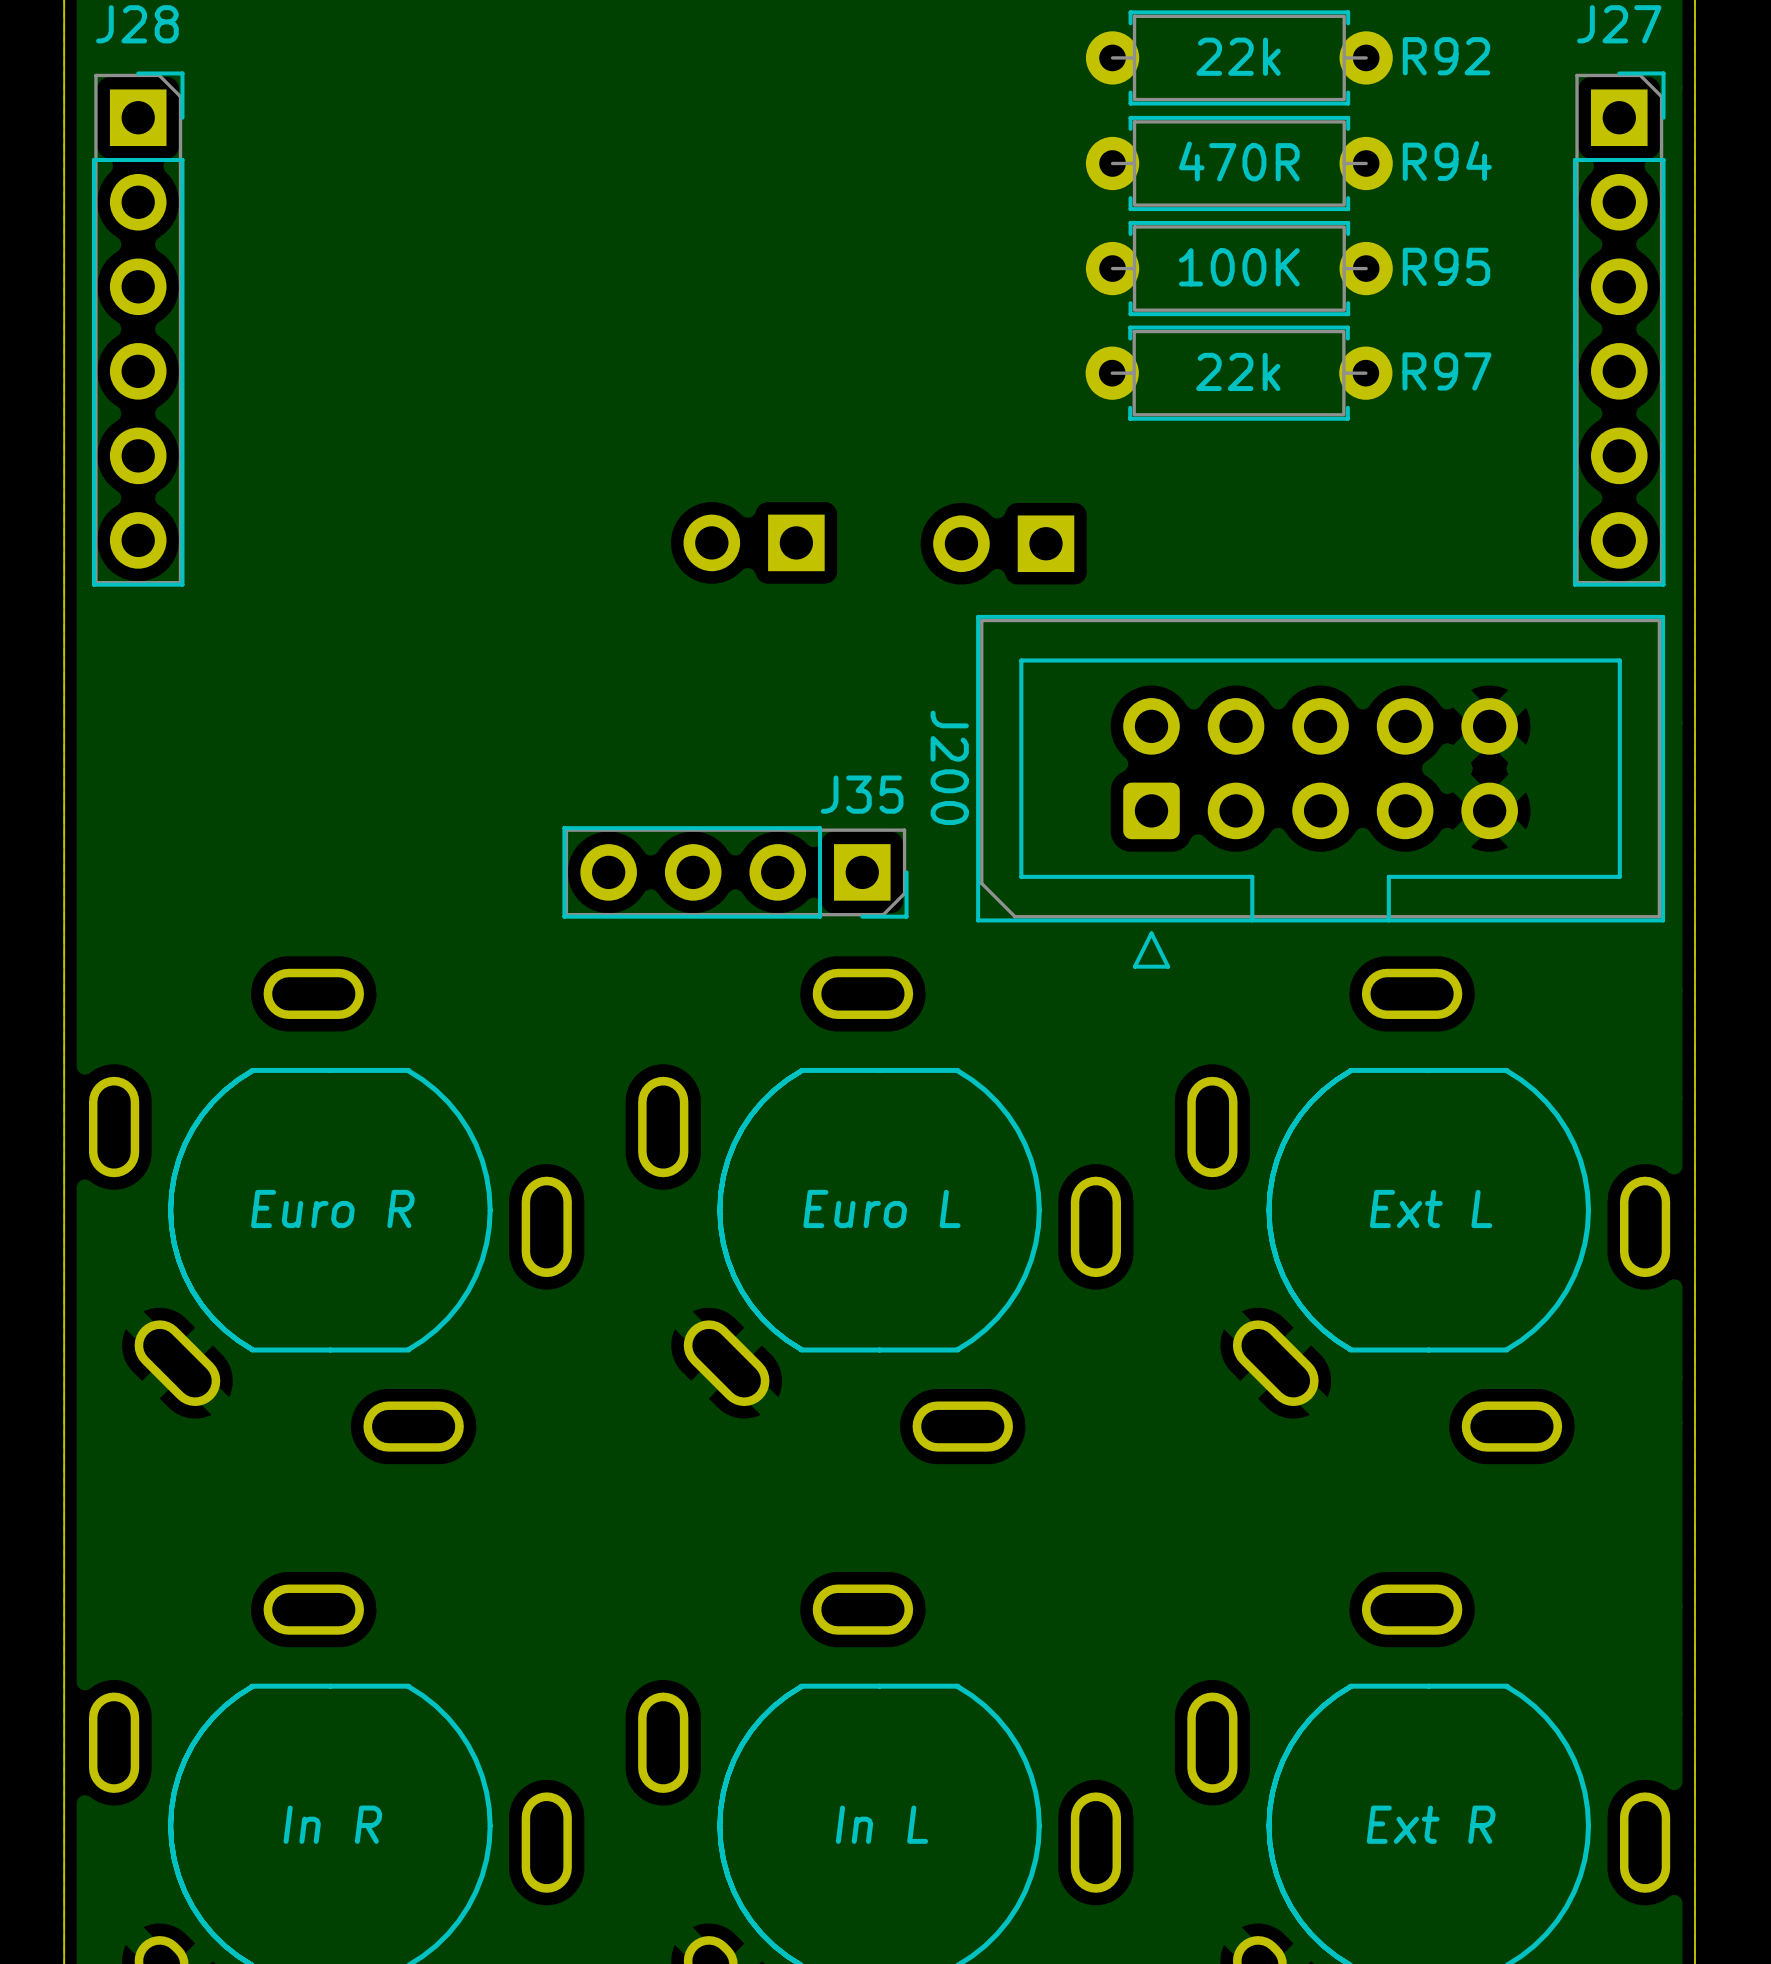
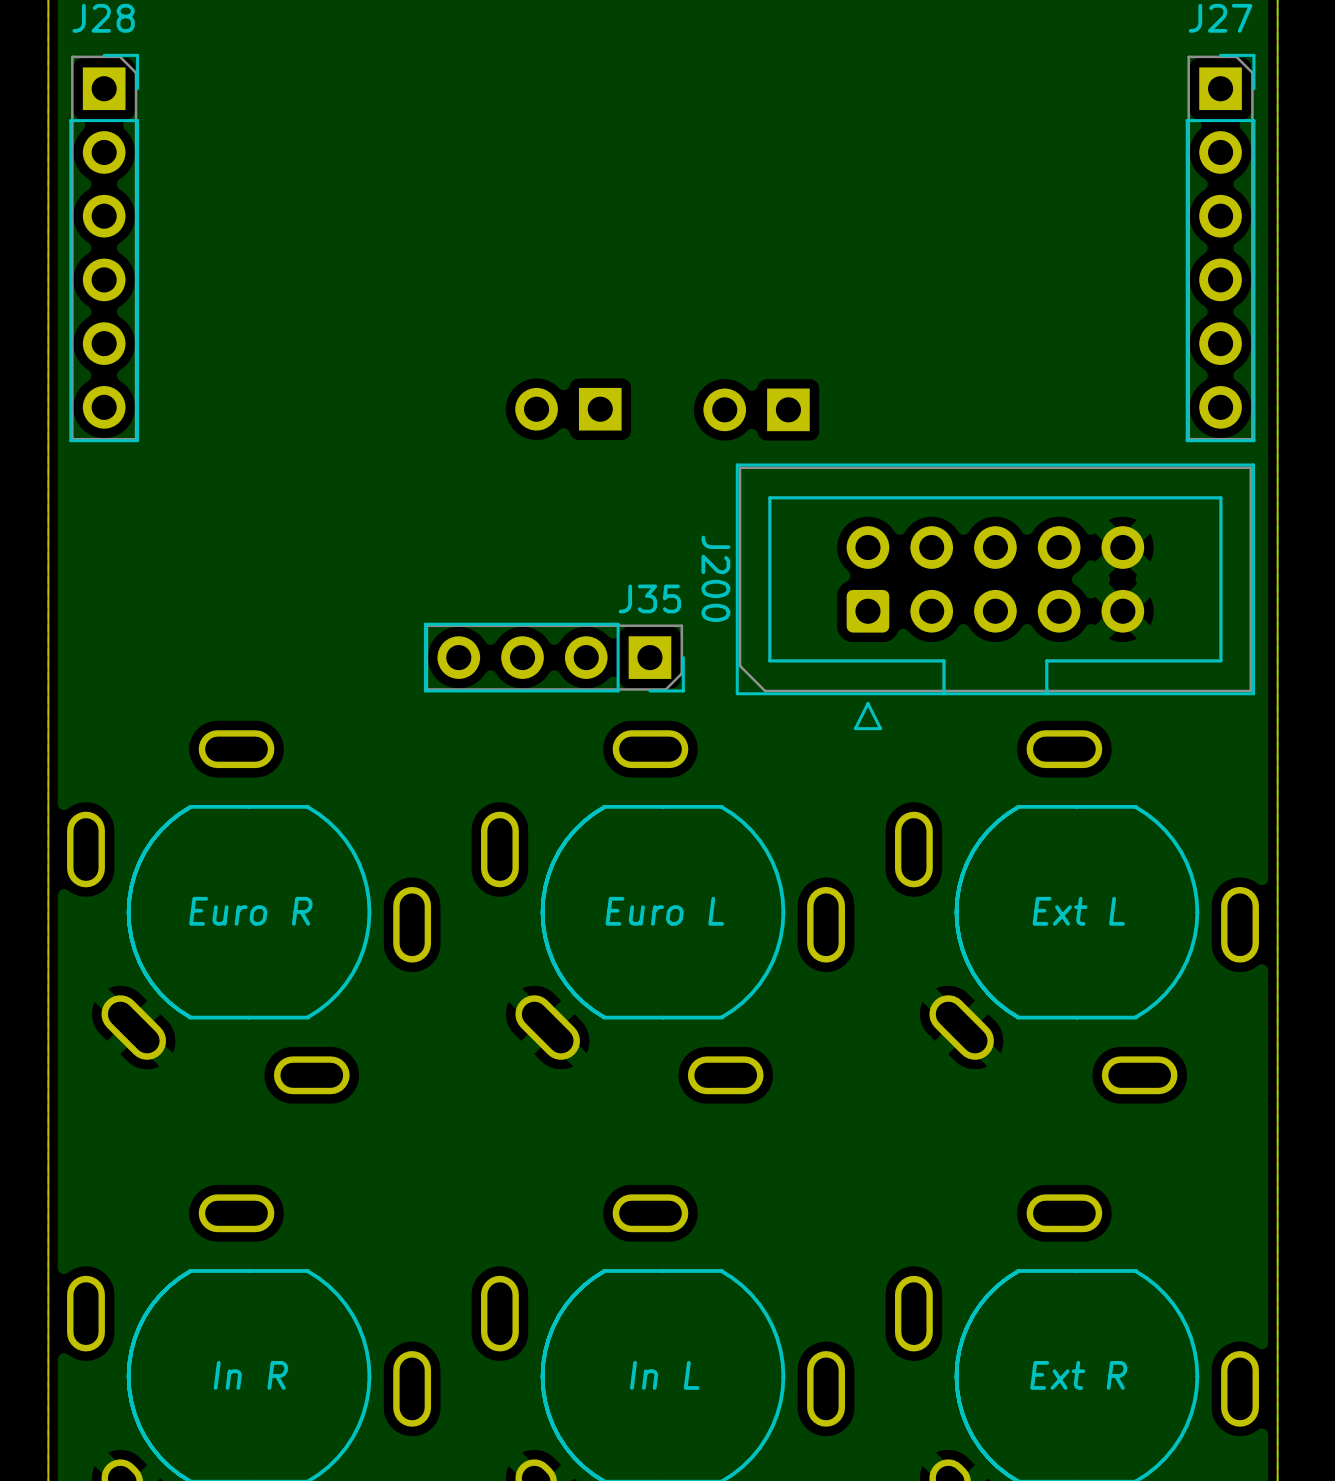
R92: 22k (1239, 57) -> none
R94: 470R (1239, 163) -> none
R95: 100K (1239, 268) -> none
R97: 22k (1239, 373) -> none

